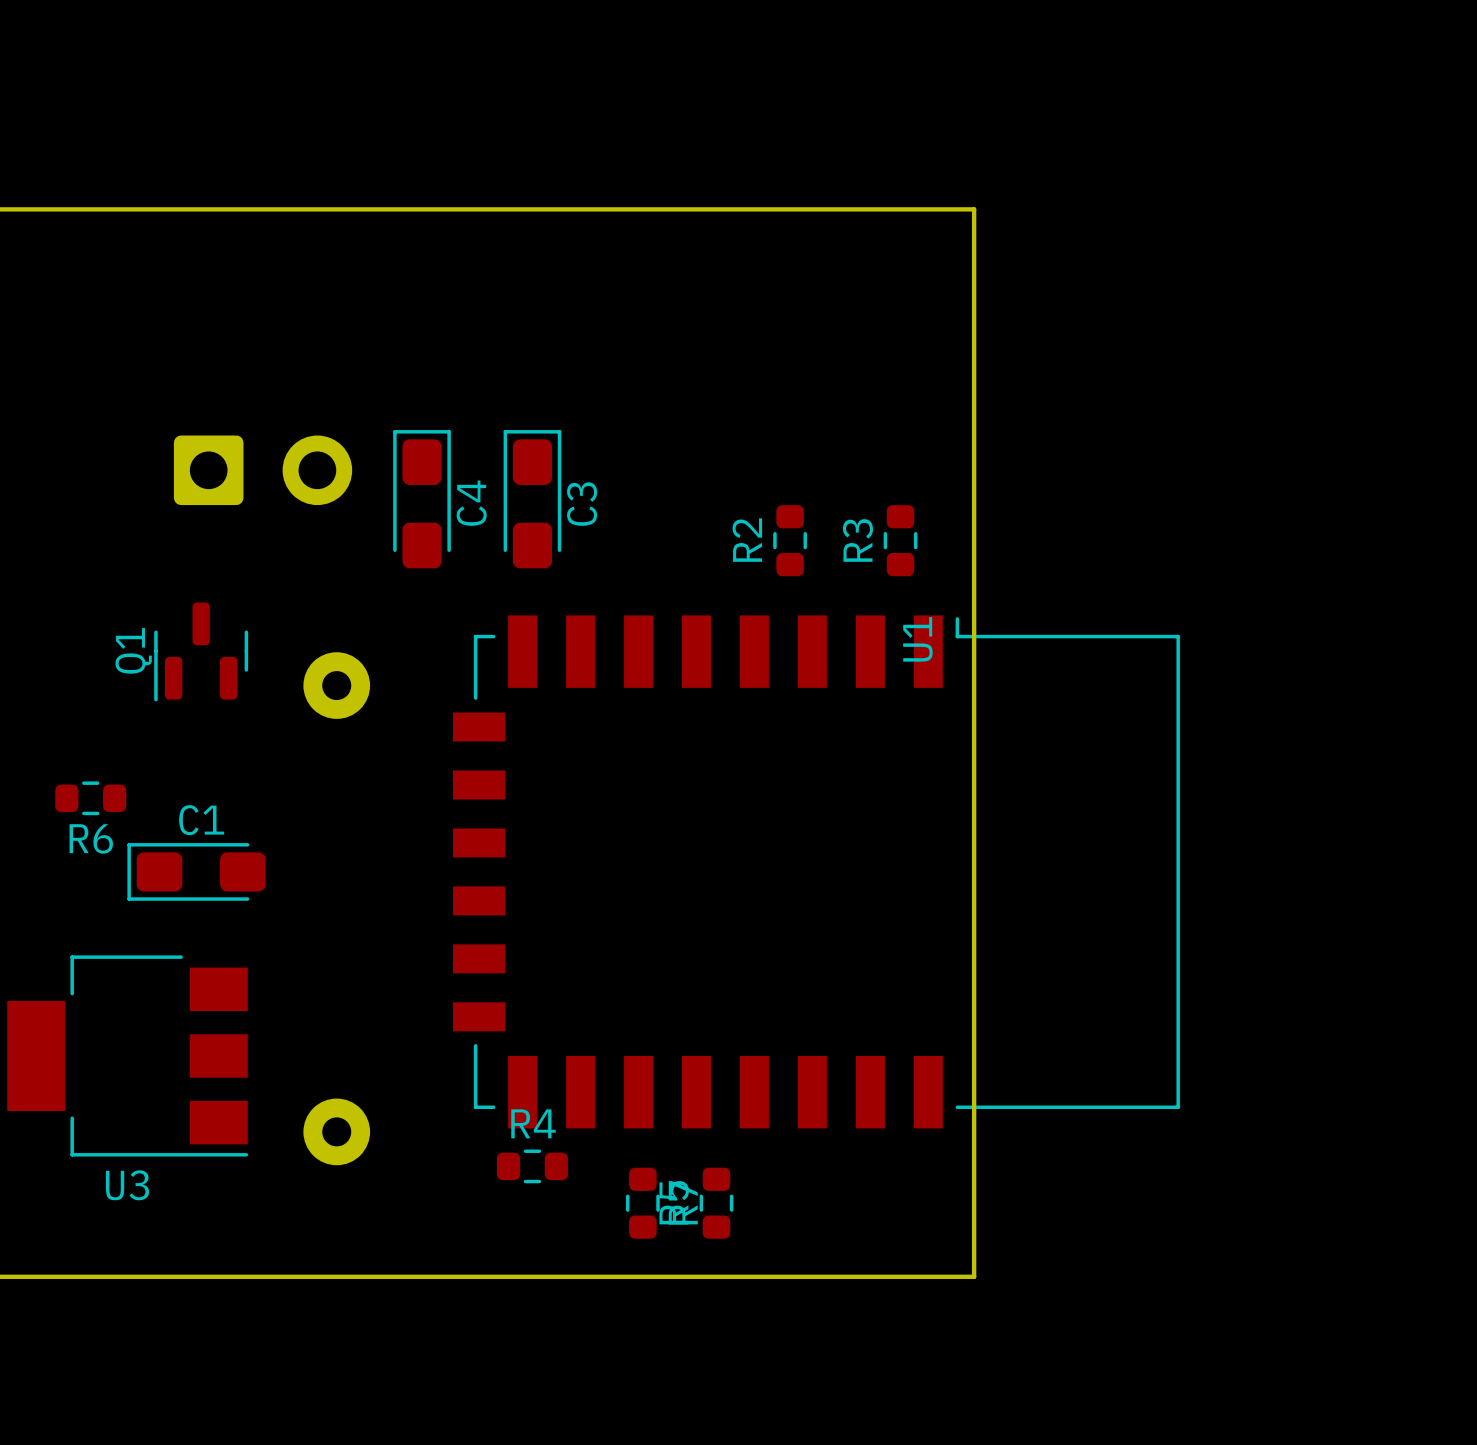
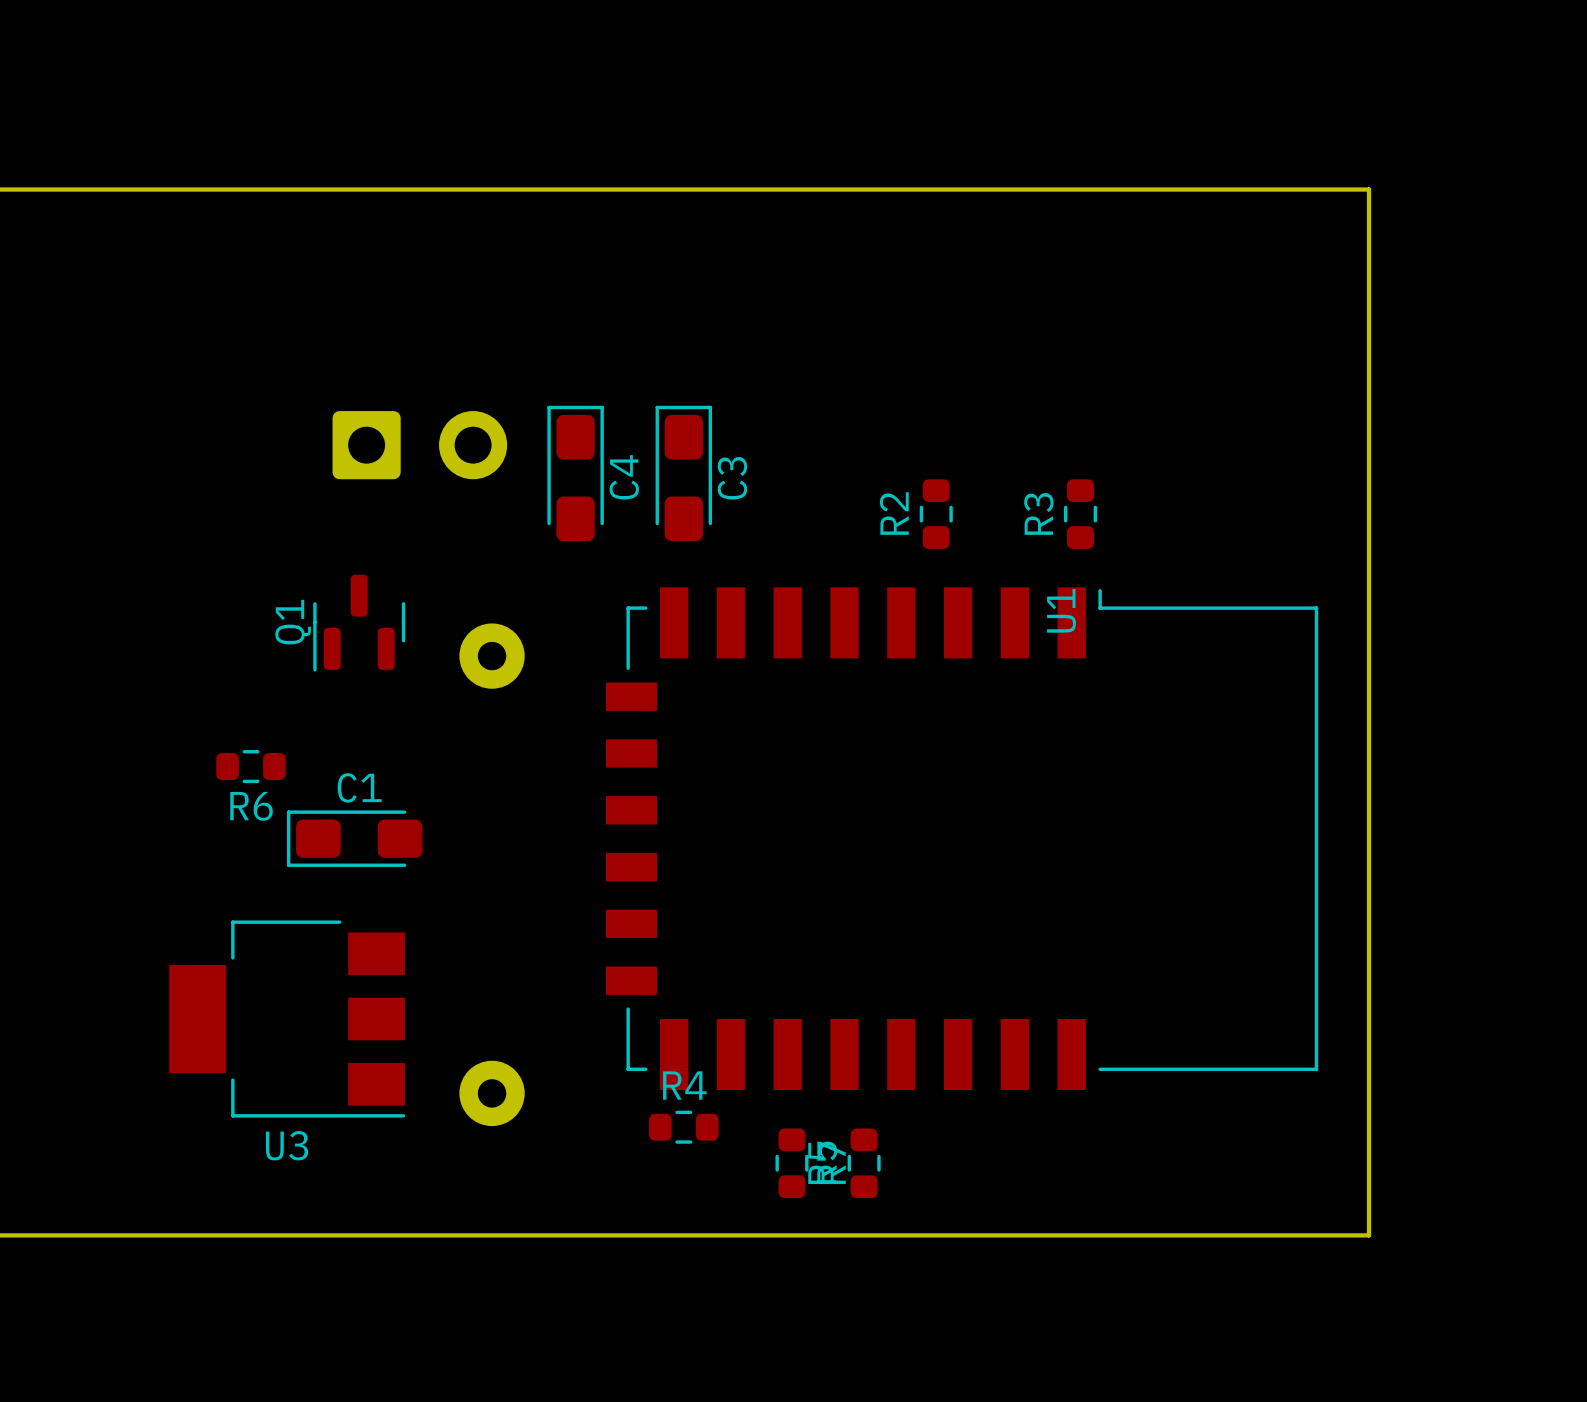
board edge: (974, 209) (974, 1276) -> (1116, 189) (1369, 189) (1369, 1235) (1116, 1235)
R3 position: (900, 540) -> (1080, 514)

